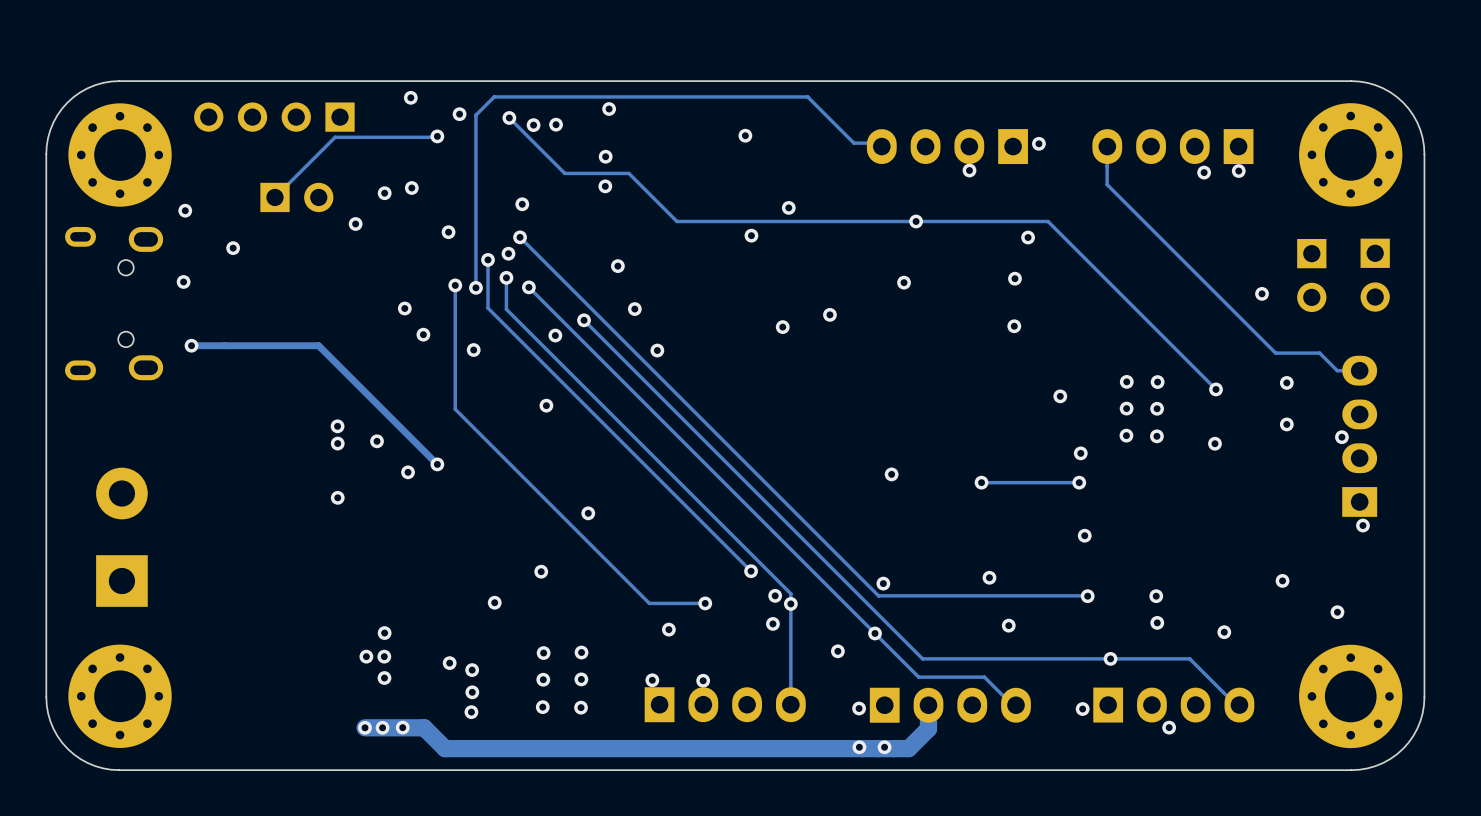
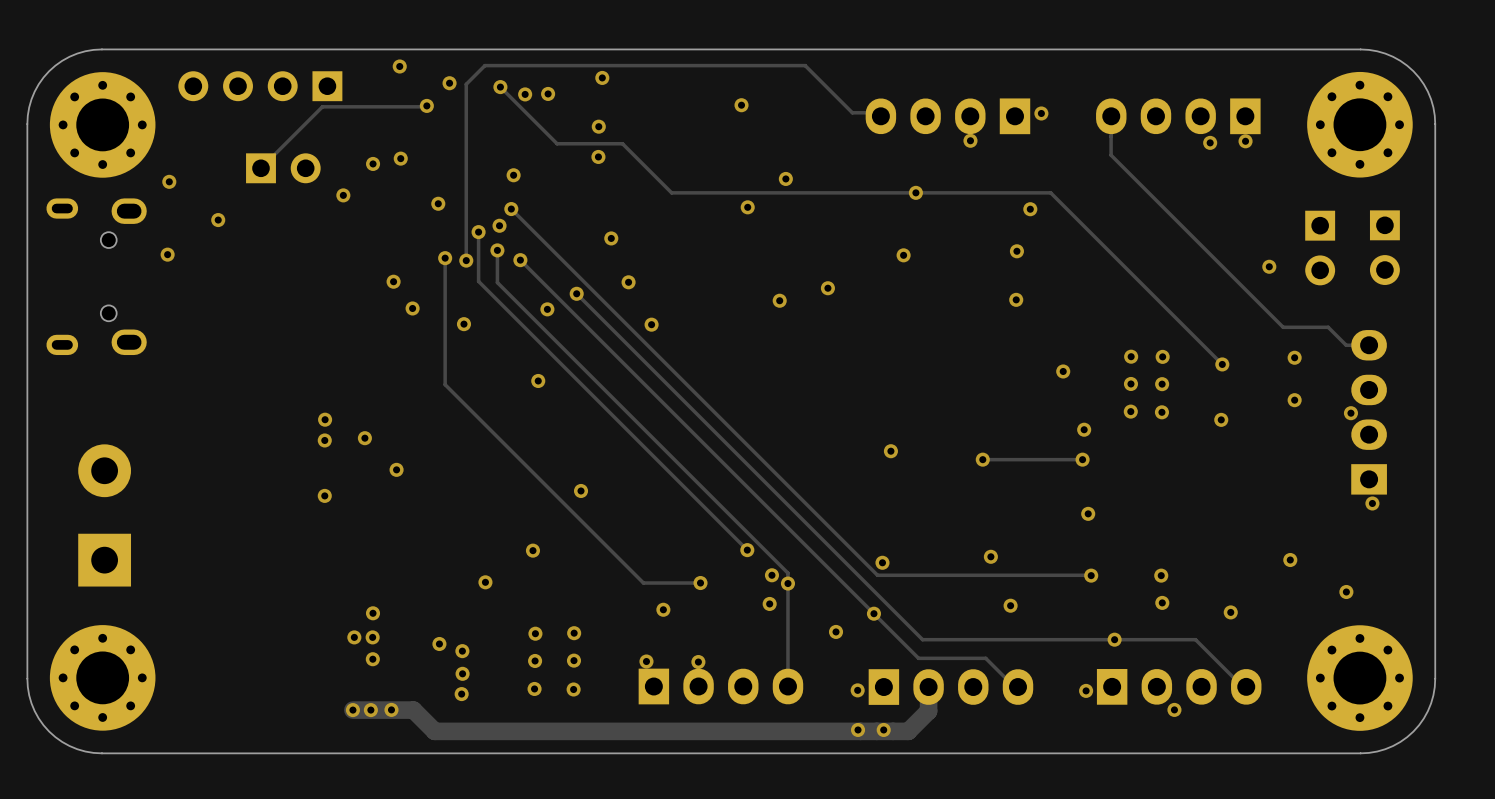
track: (191, 345) (318, 345) (437, 464) -> none
via: (191, 345) -> none
via: (337, 426) -> none
via: (377, 441) -> none
via: none -> (364, 438)
via: none -> (324, 440)
via: (437, 464) -> none
via: (408, 472) -> none
via: none -> (396, 469)
via: (337, 497) -> none
via: none -> (324, 495)

